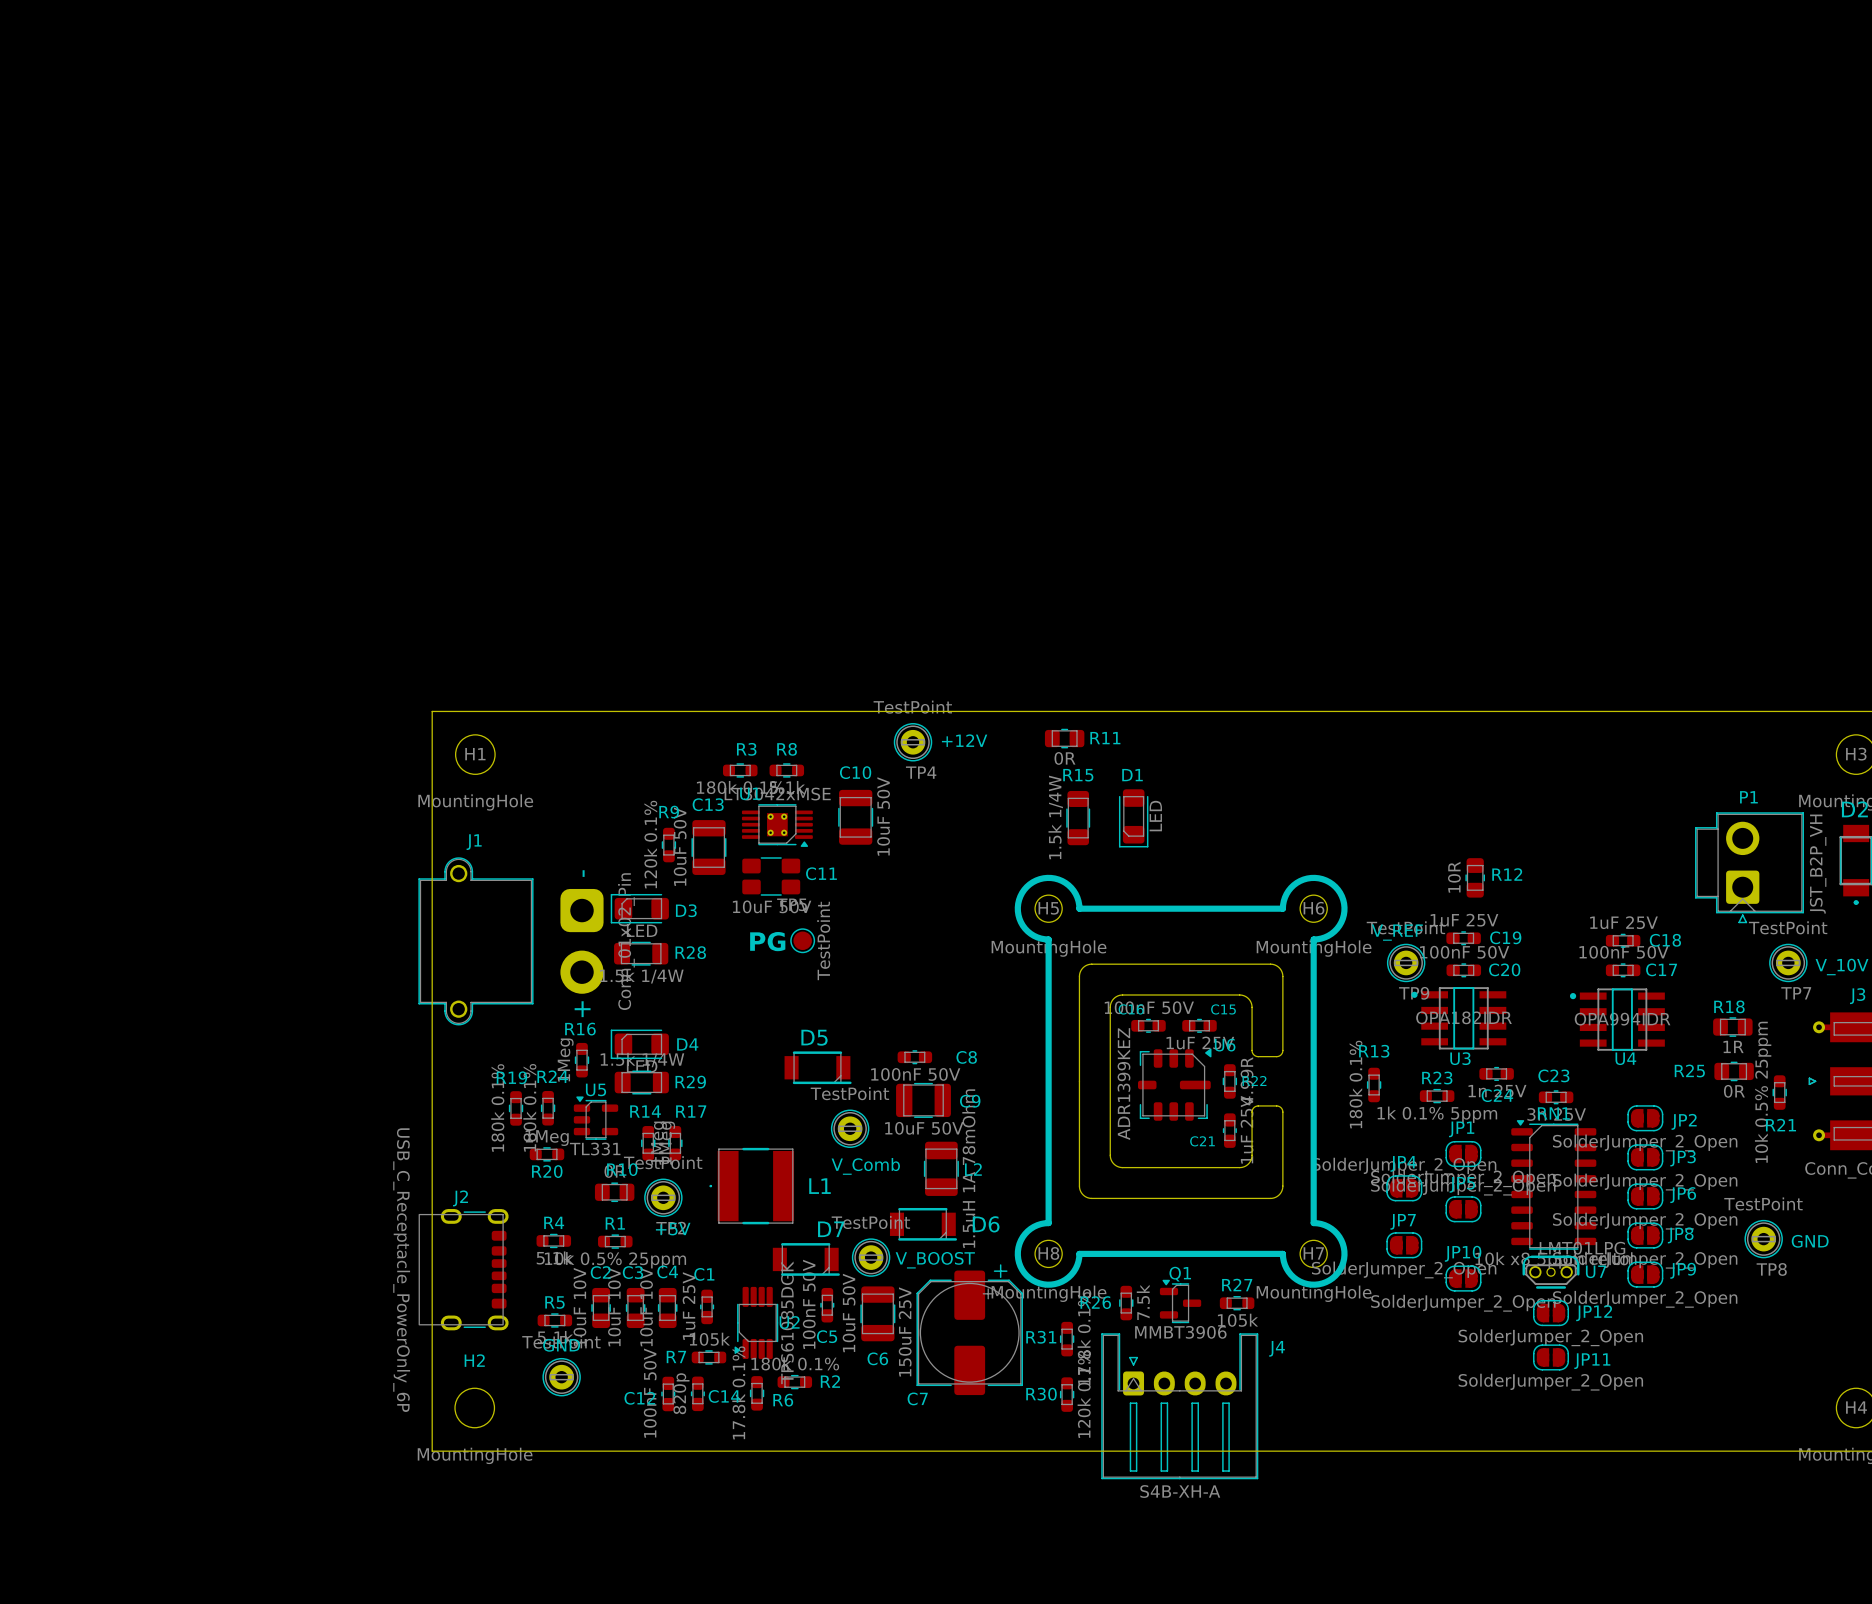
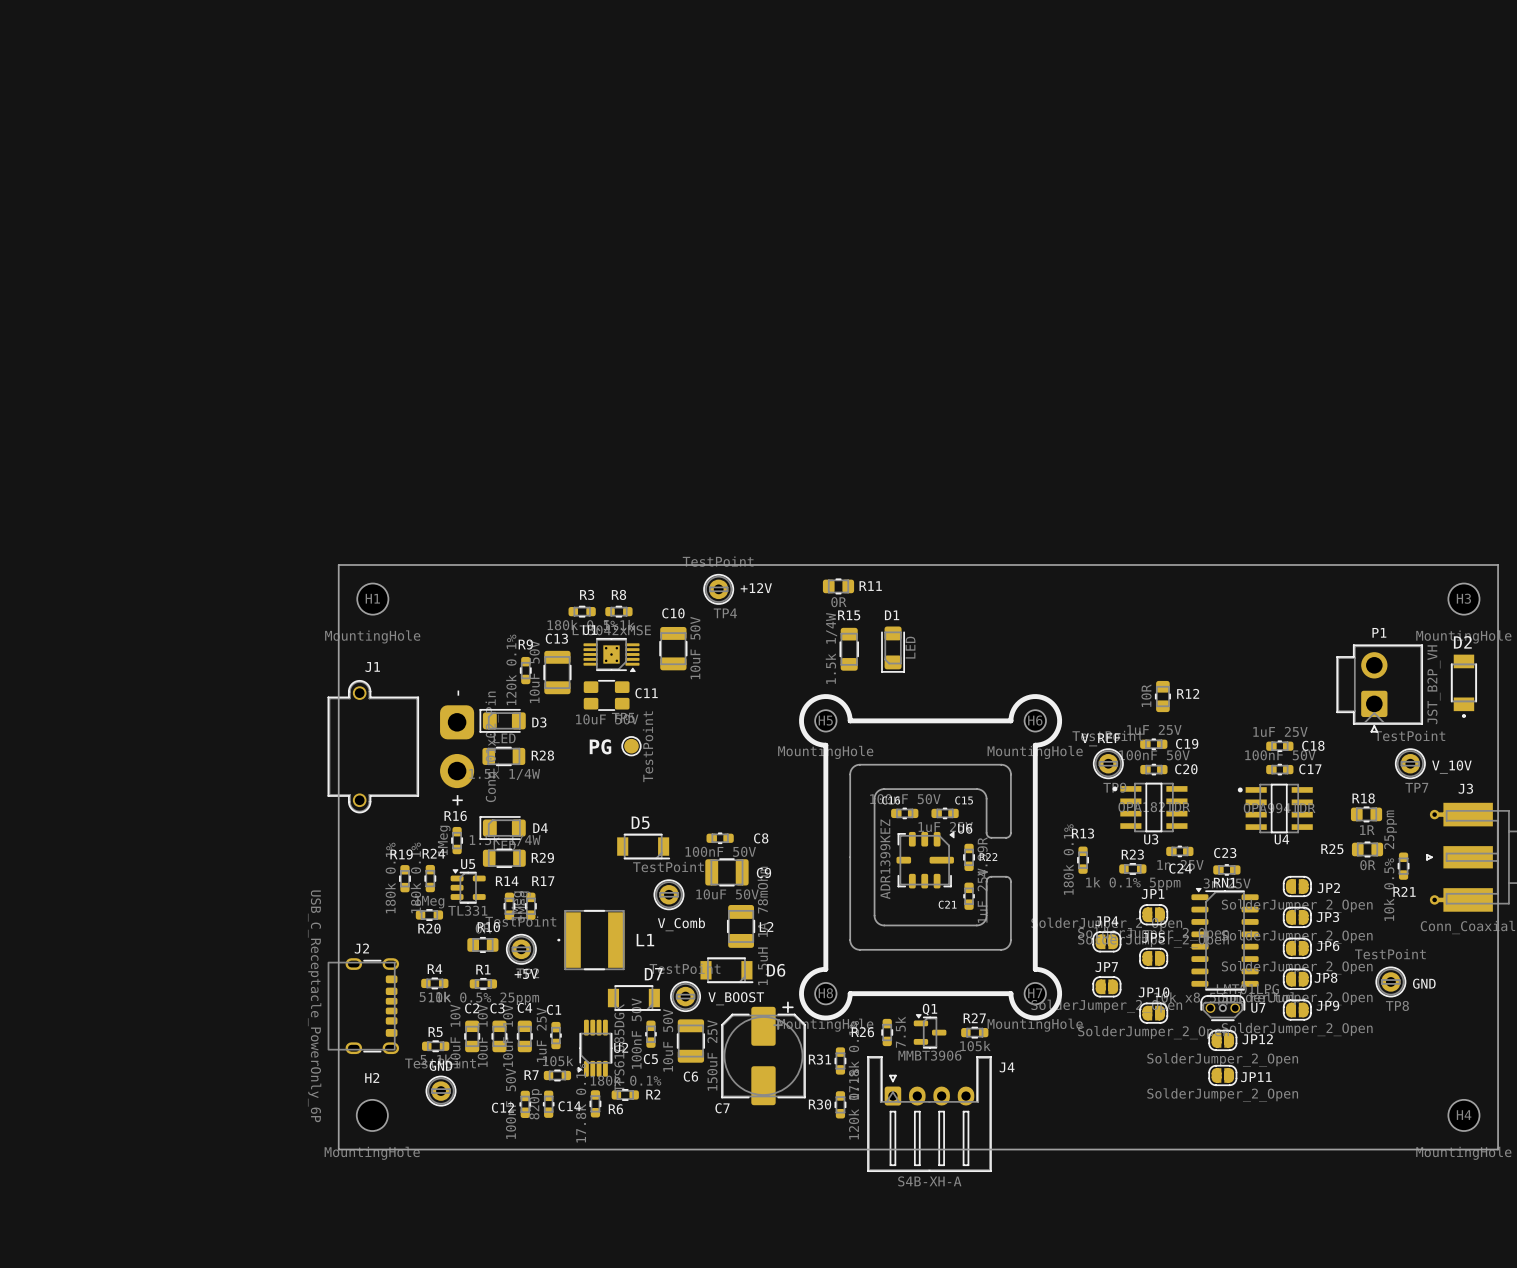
U1 footprint: [741, 804, 813, 847] -> [583, 638, 640, 673]

